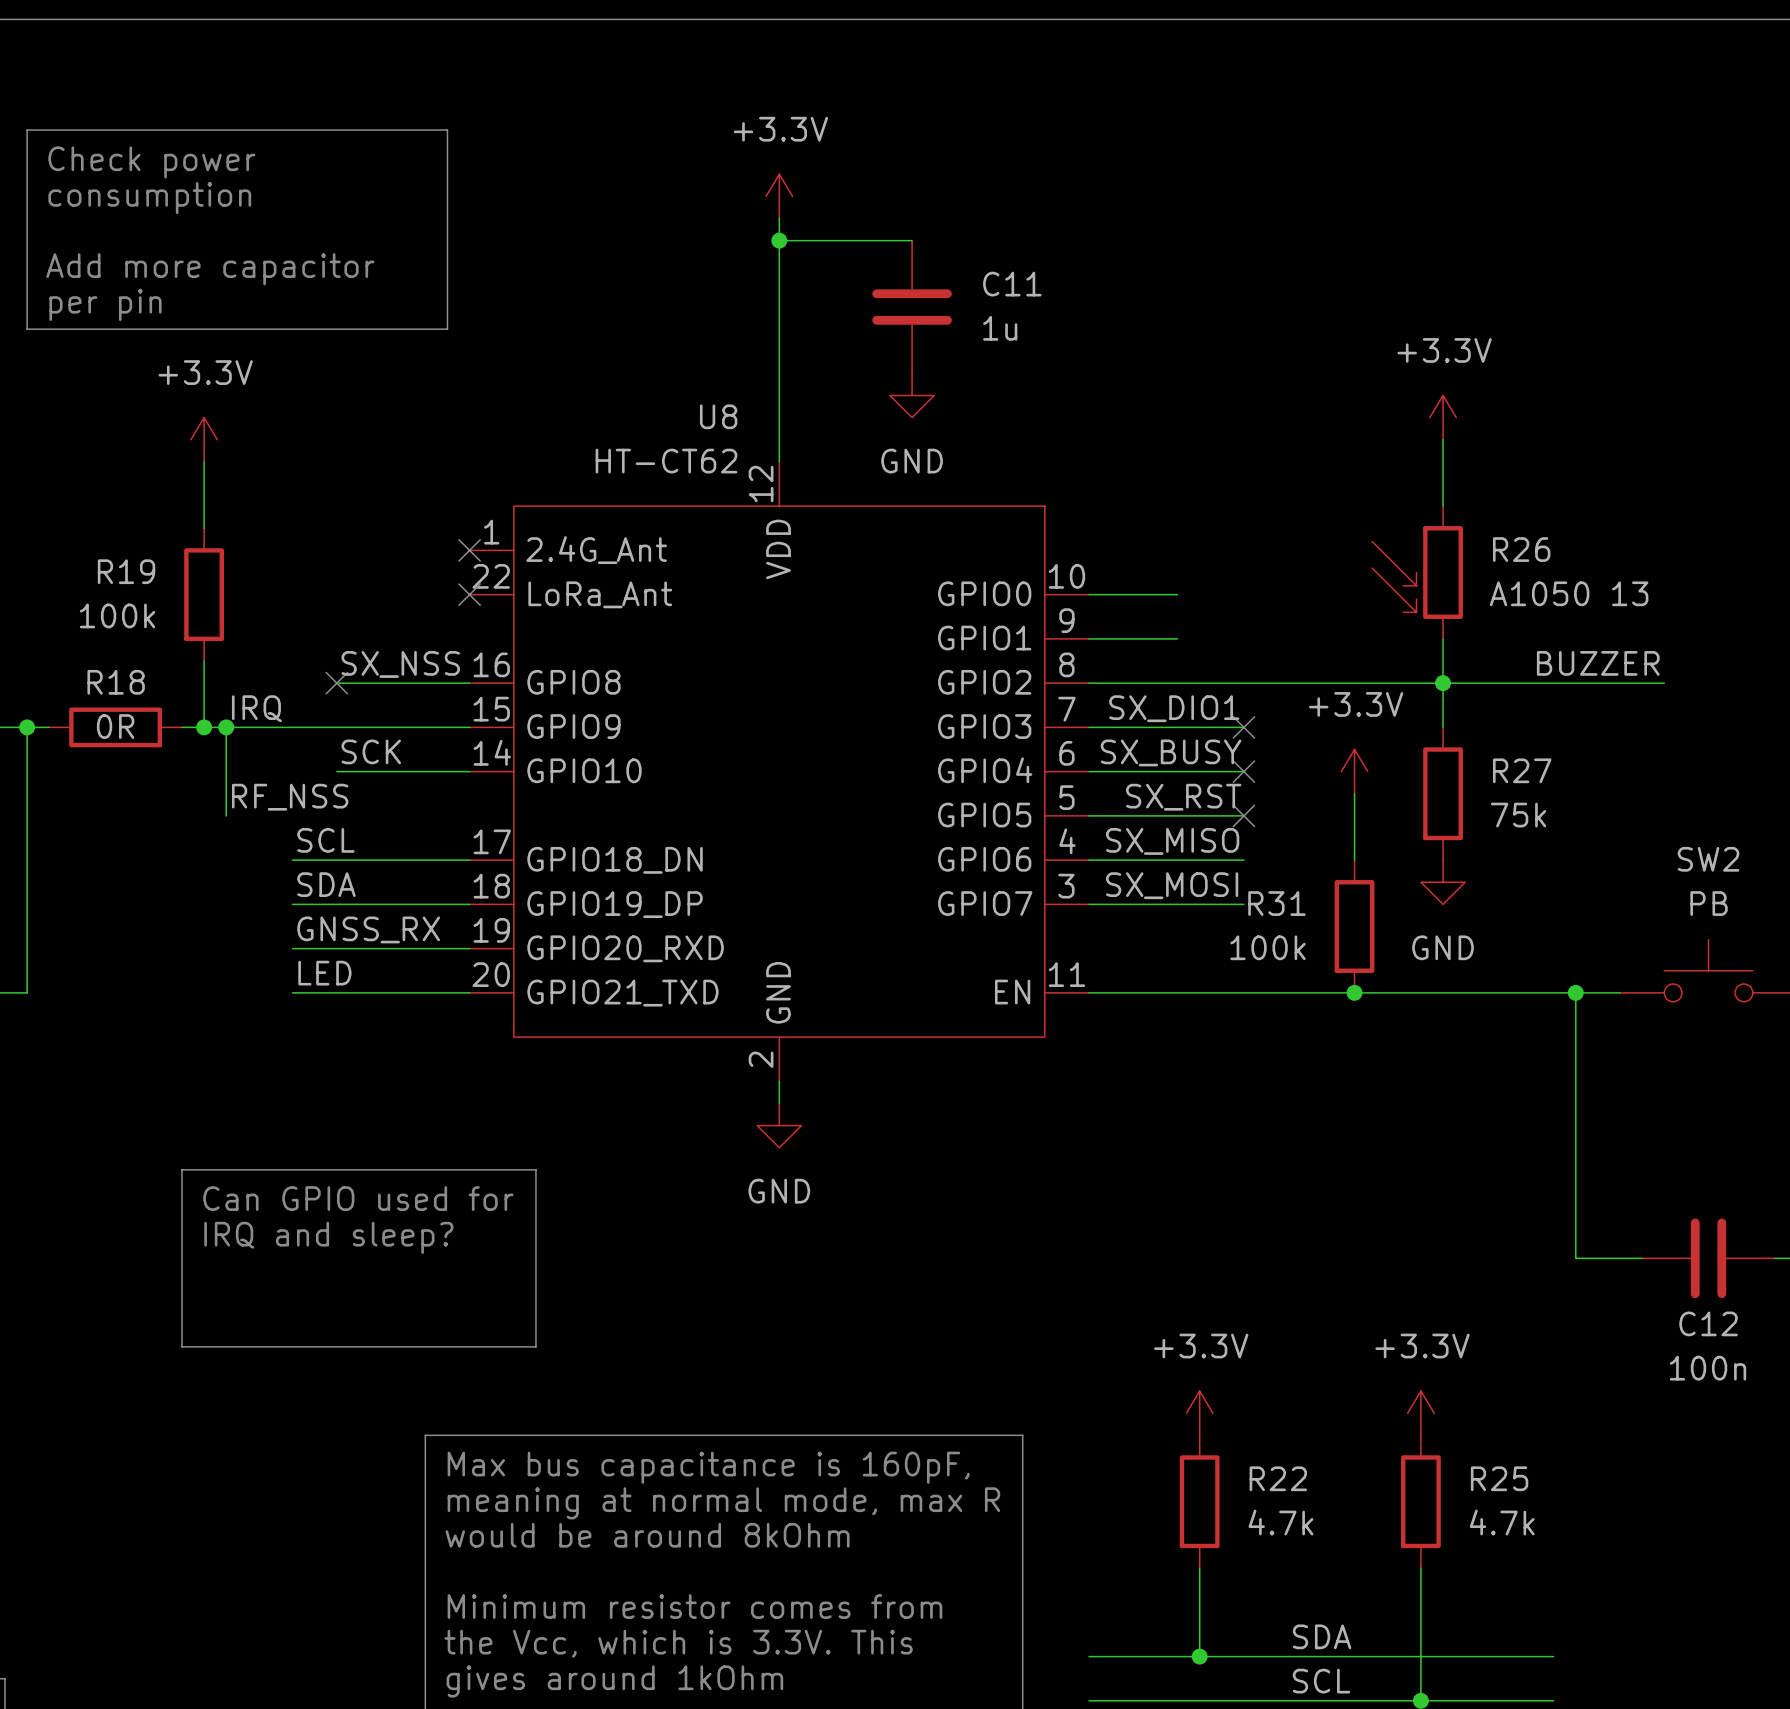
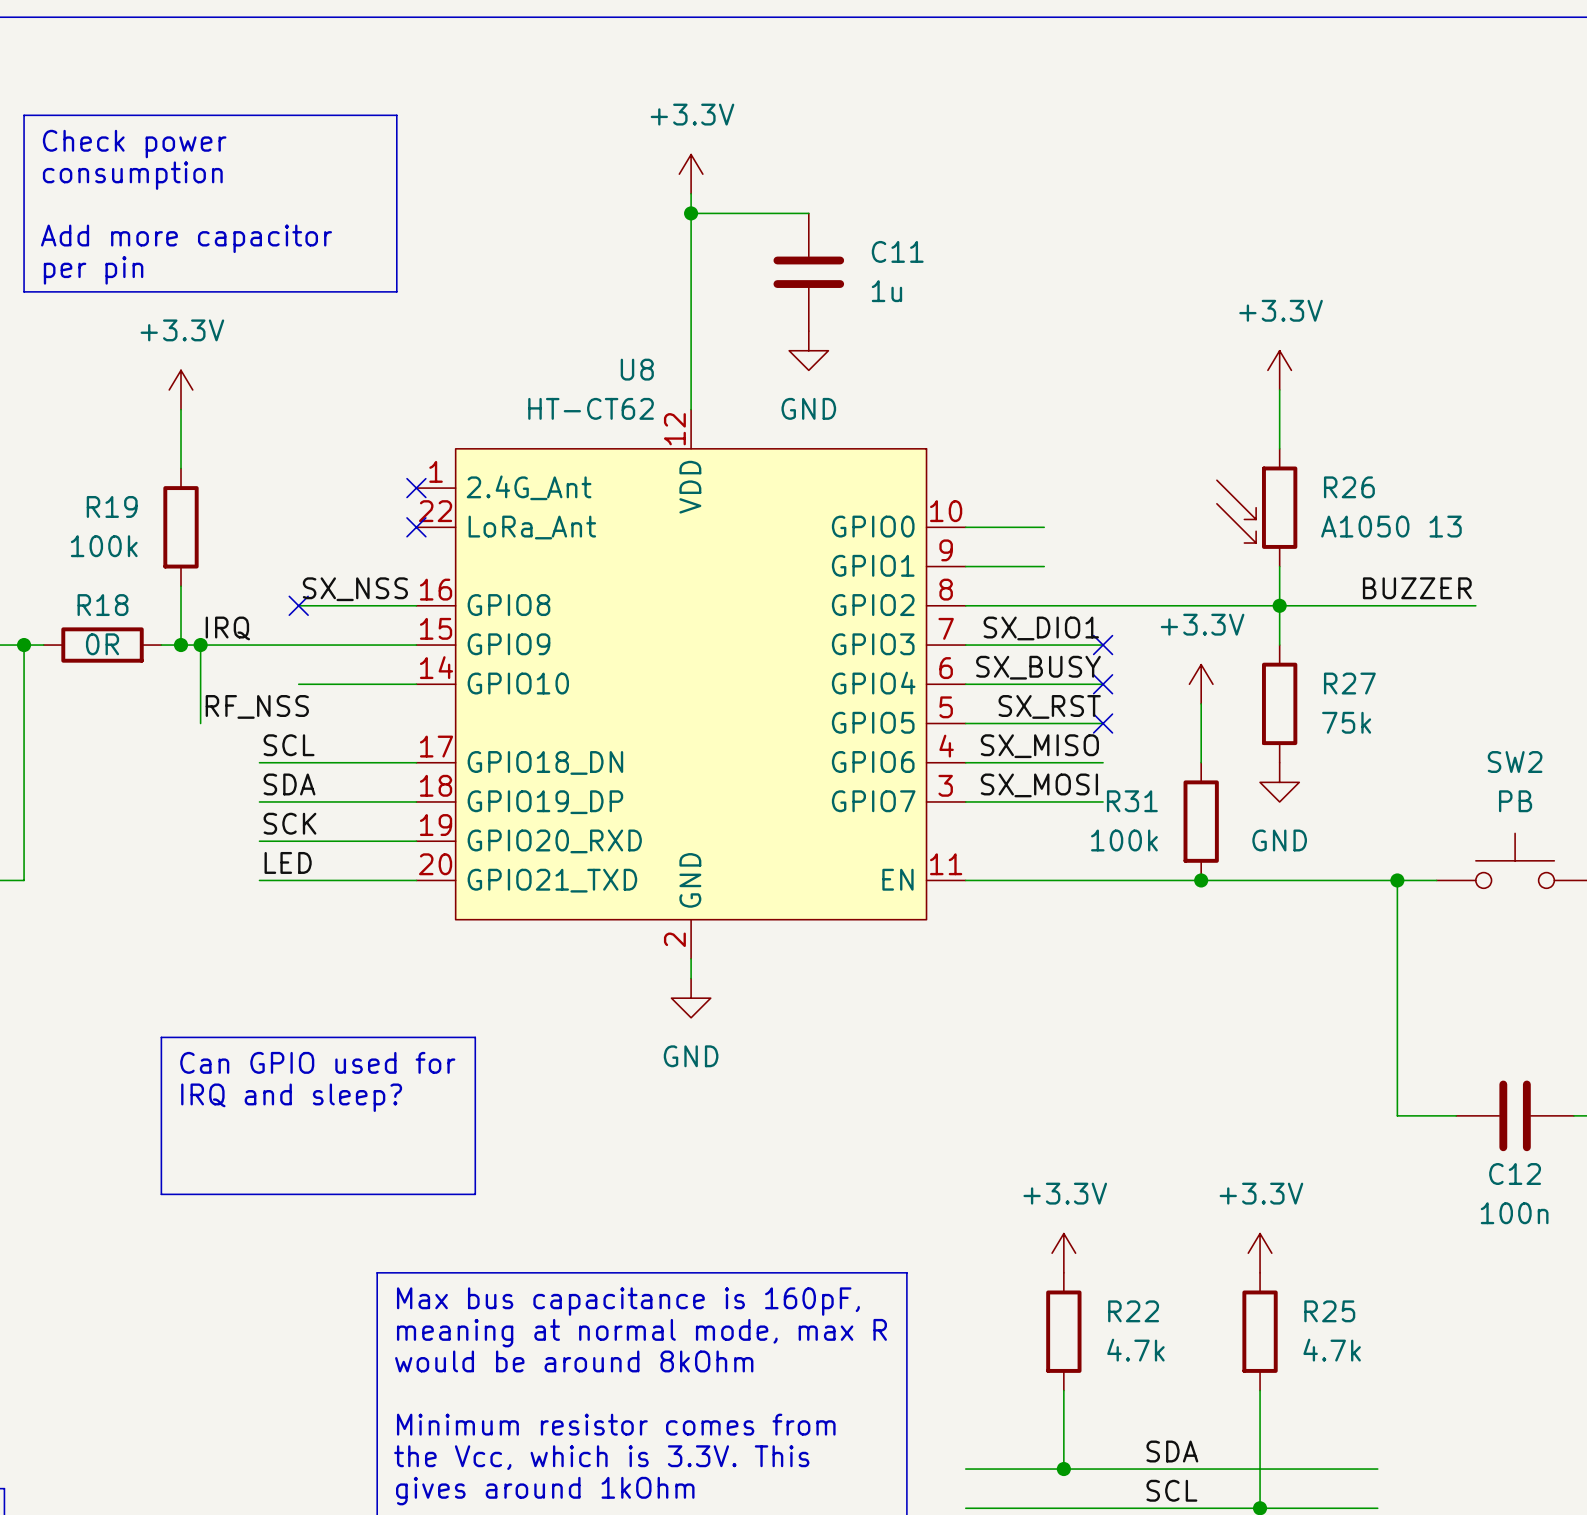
label: SCK (371, 751) -> none
label: GNSS_RX (368, 929) -> SCK (289, 823)

